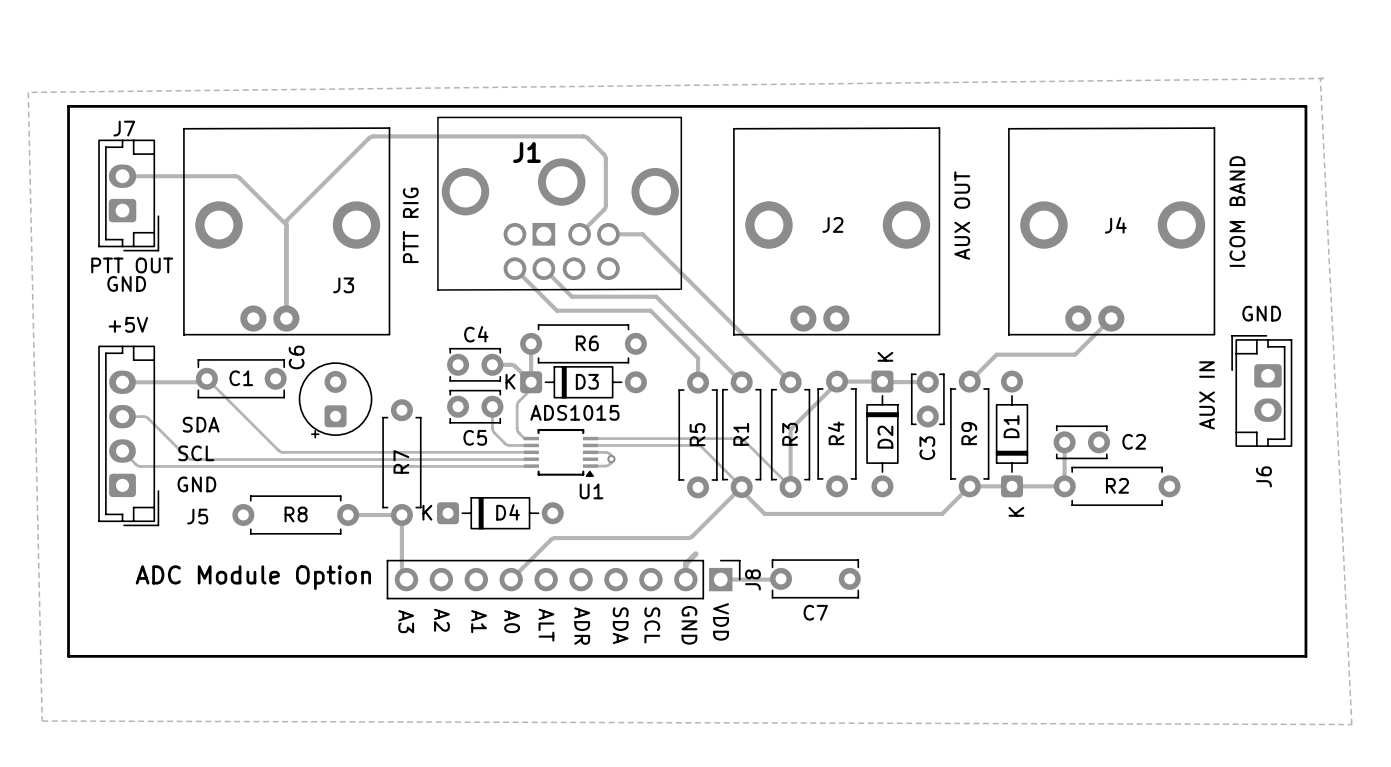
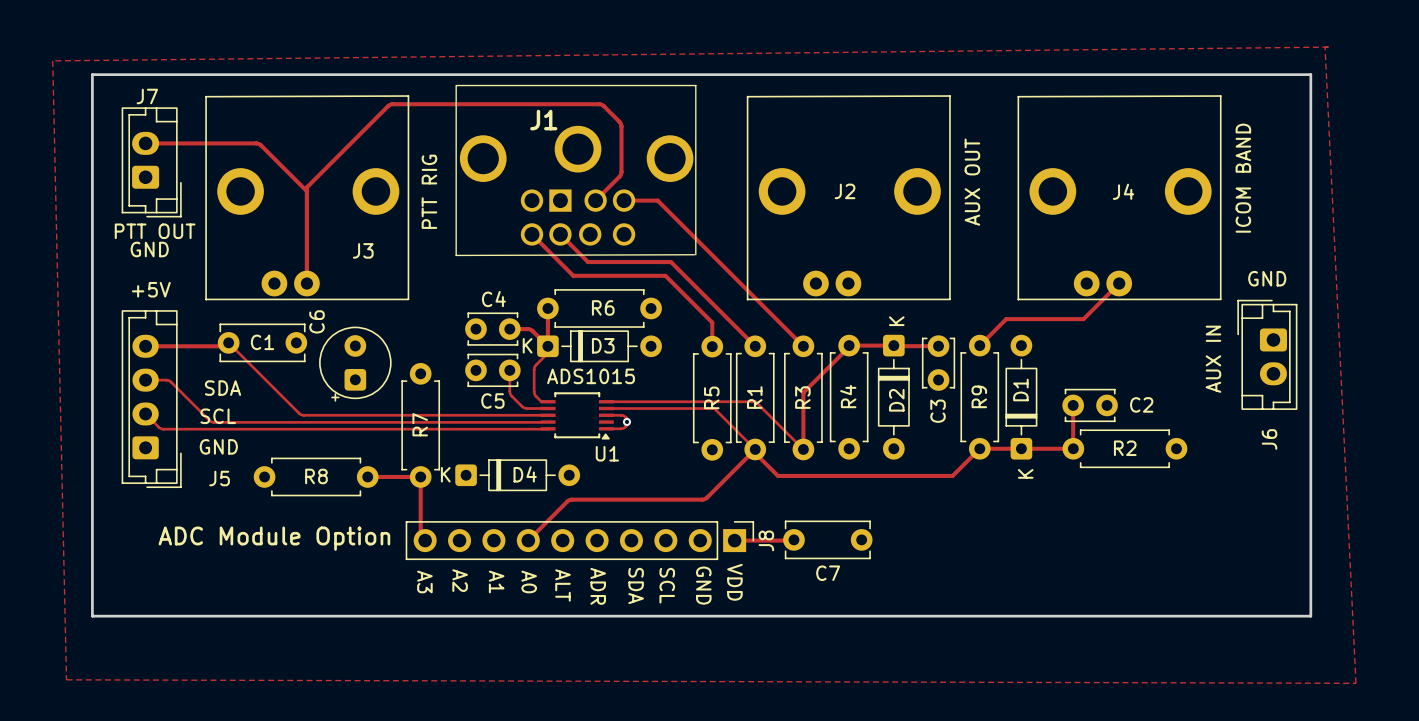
track: (695, 553) (685, 563) (685, 579) -> none

